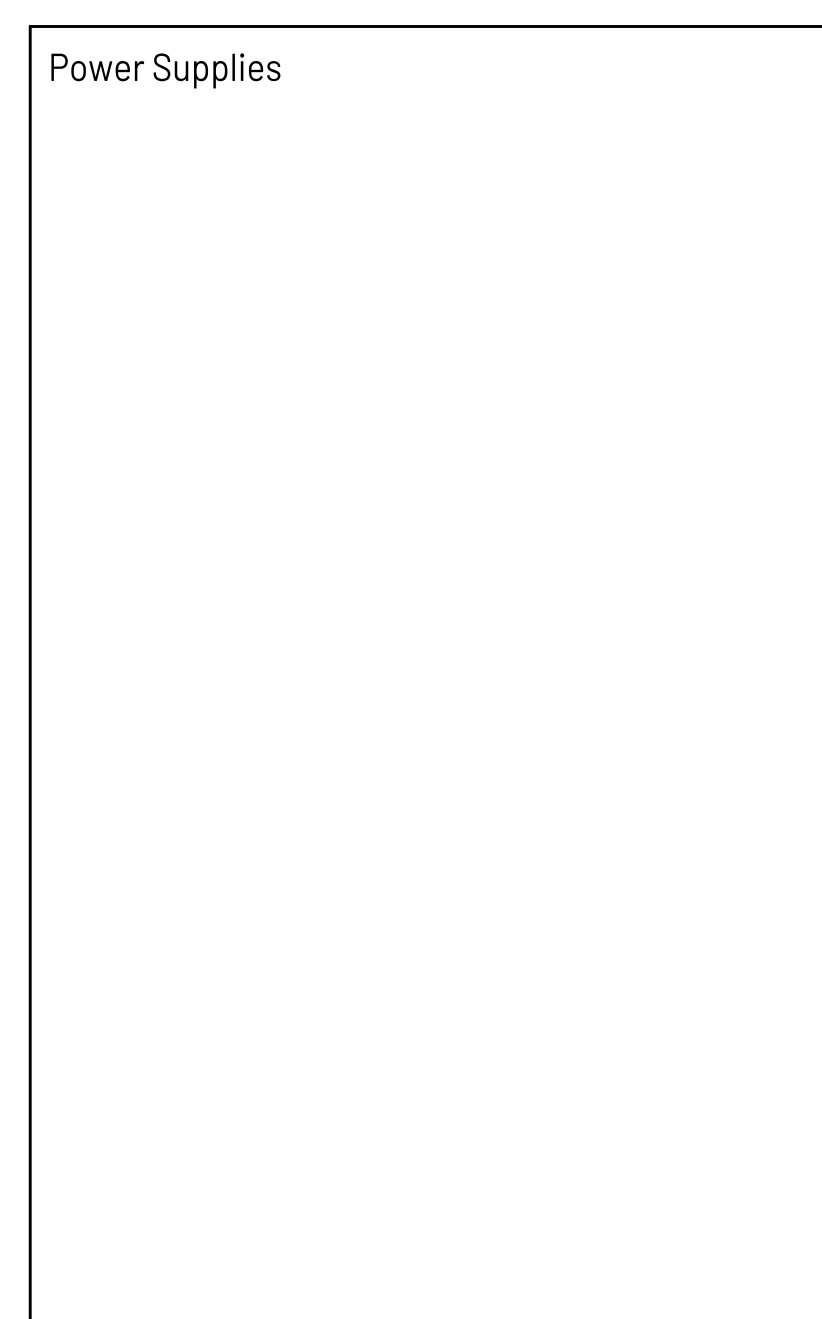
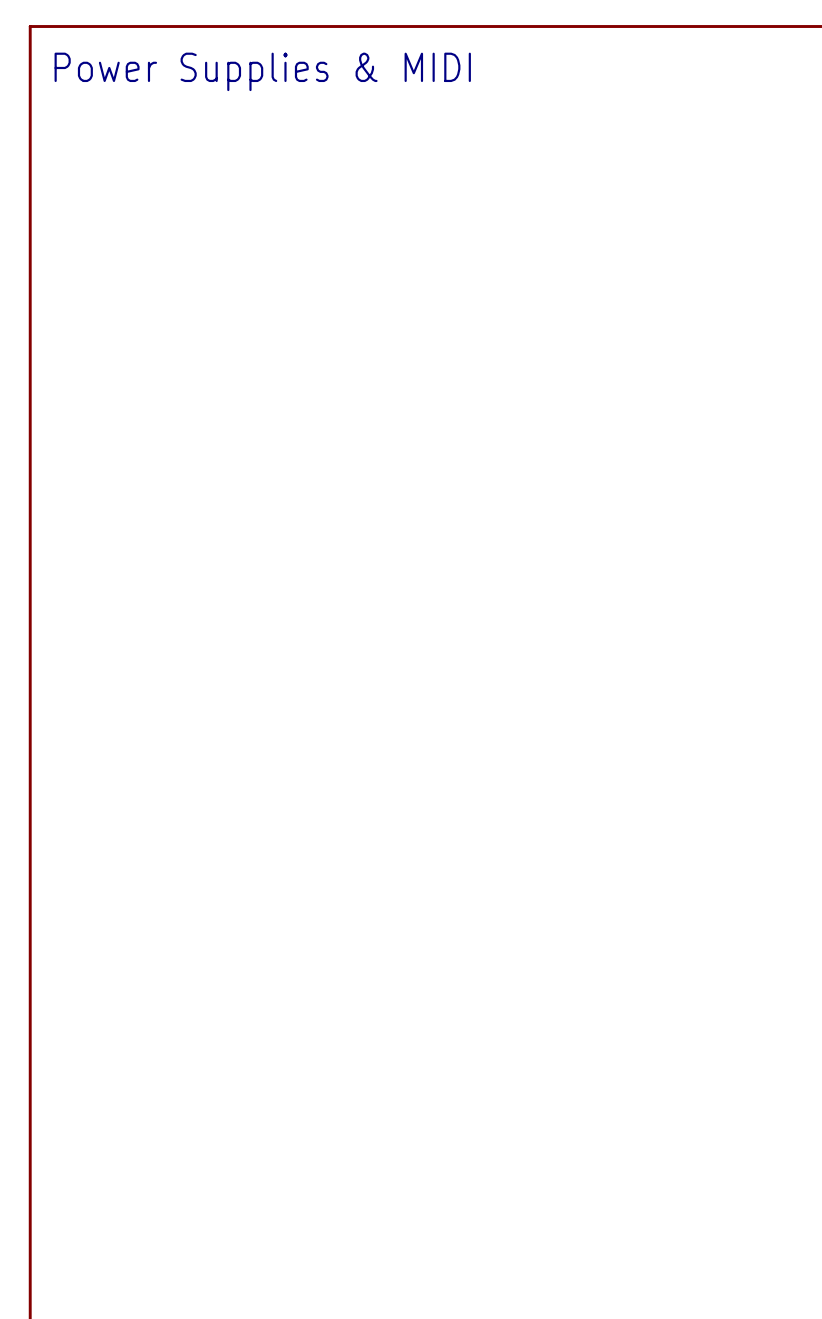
text: Power Supplies (165, 70) -> Power Supplies & MIDI (262, 71)

